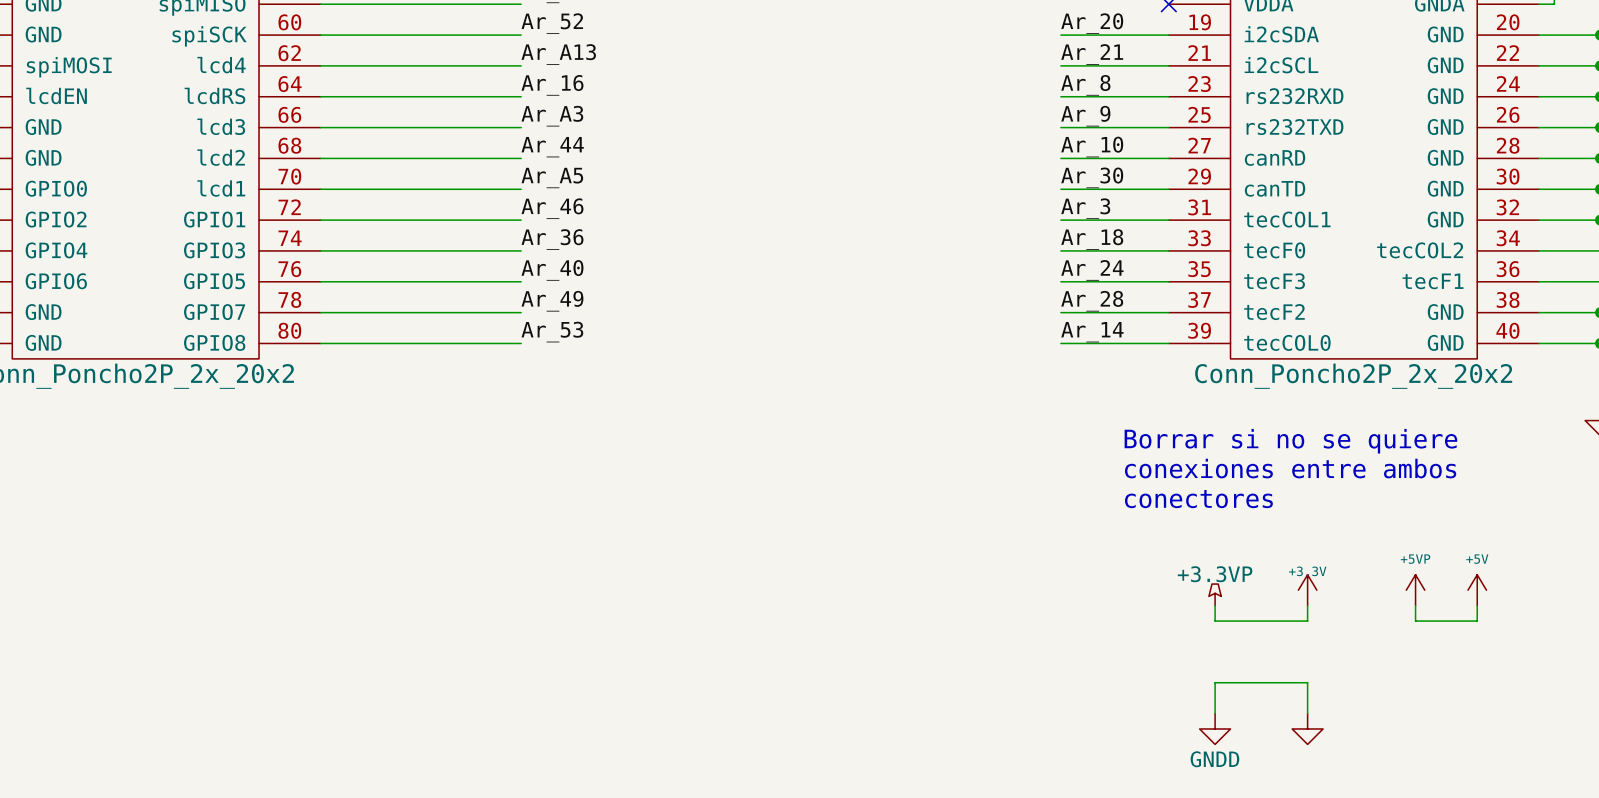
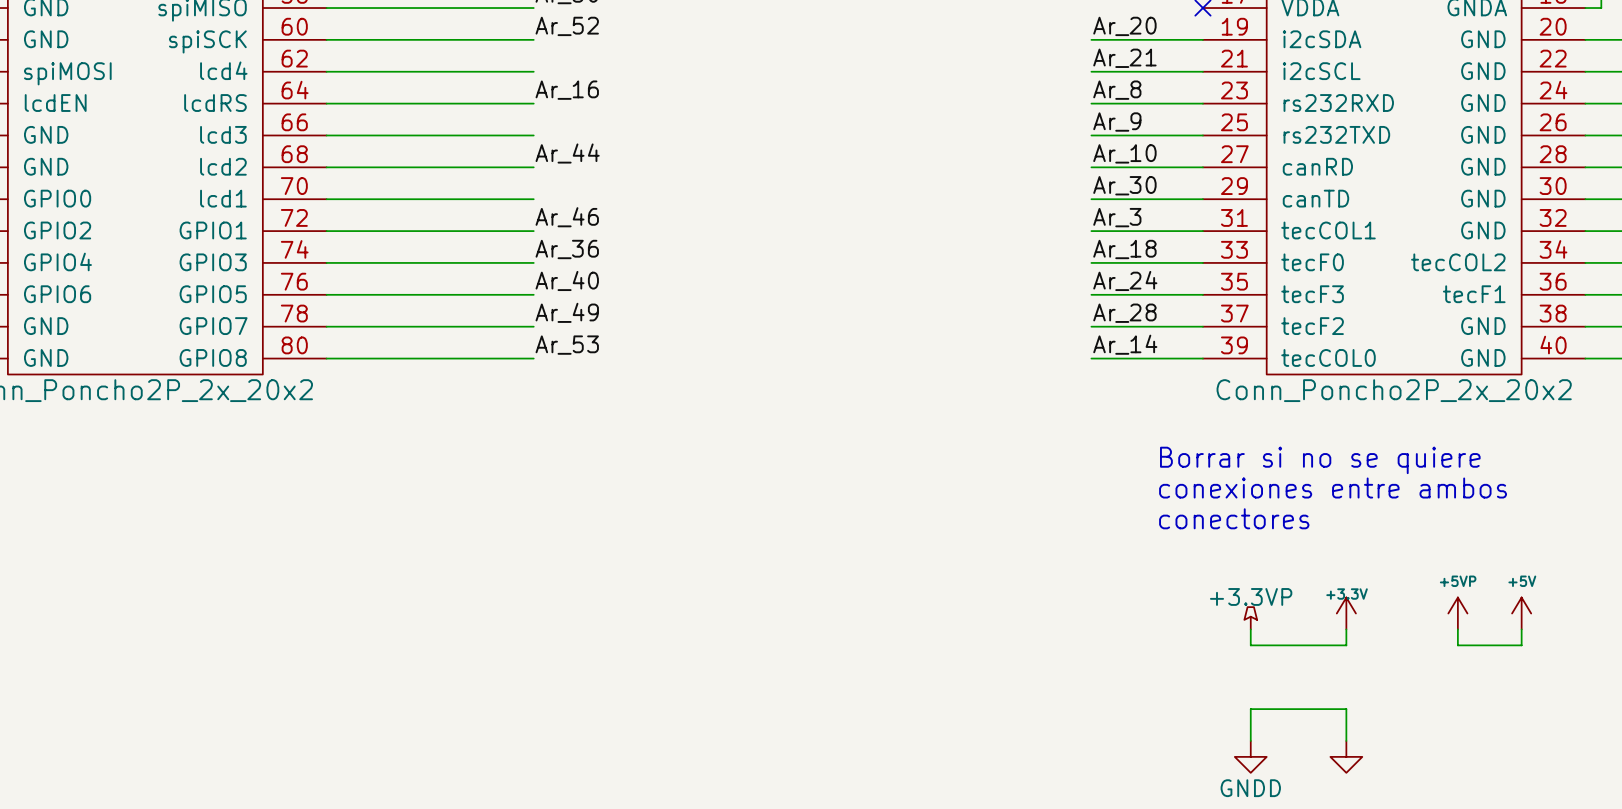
label: Ar_A13 (558, 54) -> none
label: Ar_A3 (552, 116) -> none
label: Ar_A5 (552, 178) -> none

